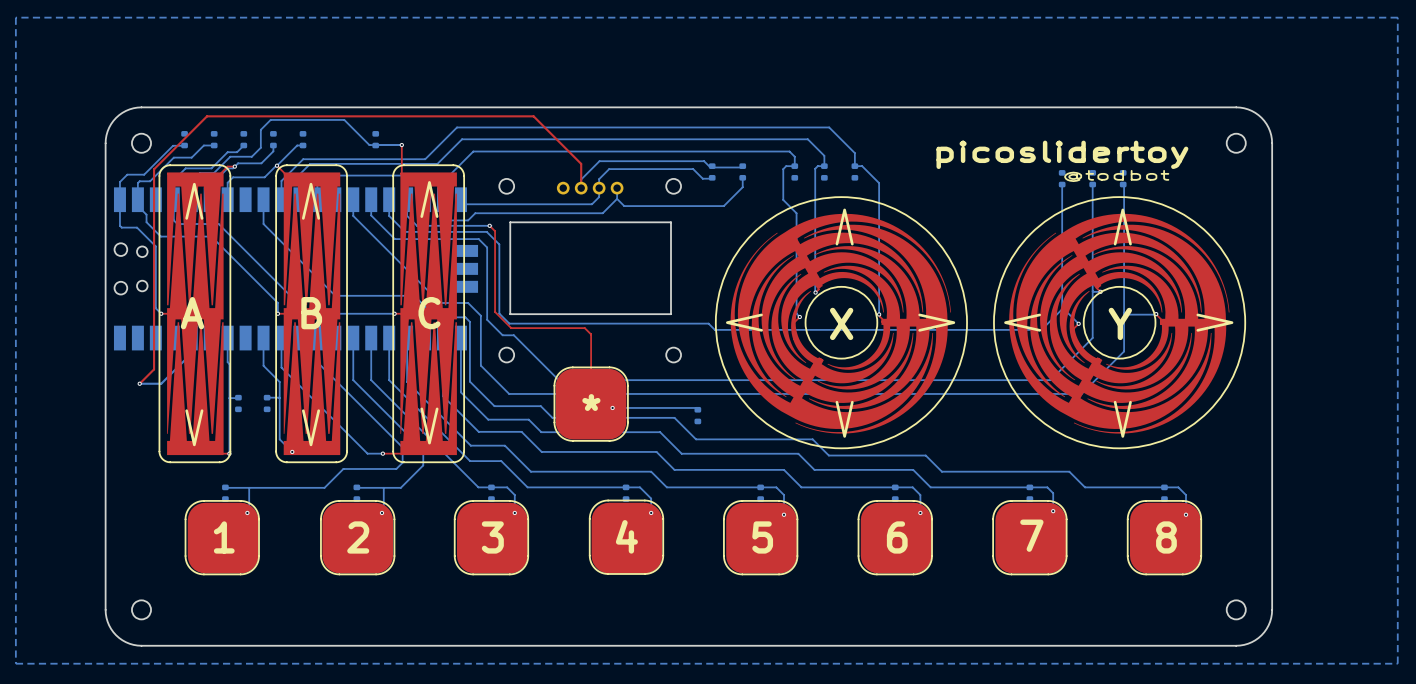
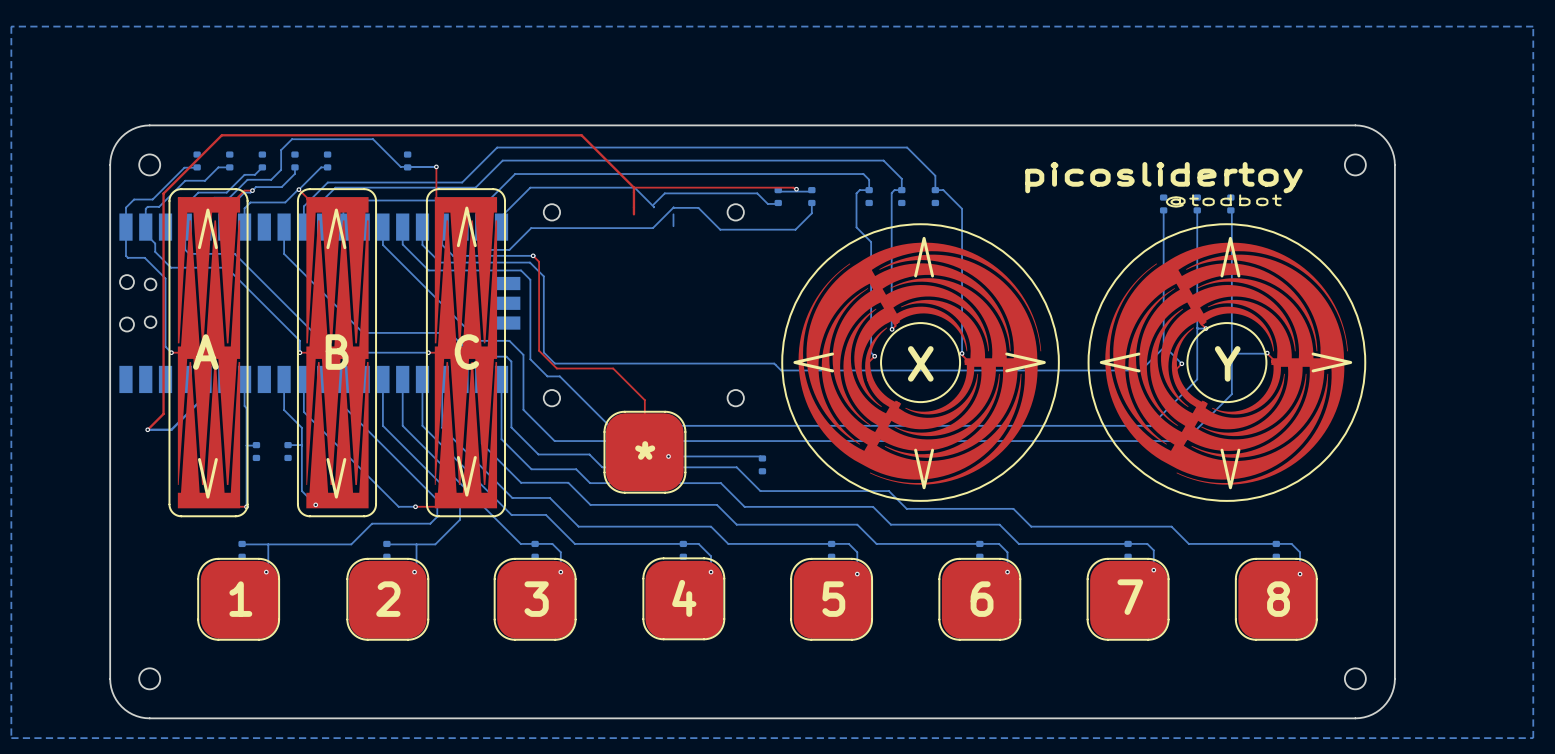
top track: none -> (633, 187) (793, 187) (796, 189)
via: none -> (796, 189)
bottom track: (709, 167) (704, 161) (599, 161) (581, 179) (581, 188) -> none
bottom track: (599, 179) (599, 197) (591, 204) (462, 204) (460, 206) -> (653, 207) (634, 187) (530, 187) (501, 216) (501, 234)
part: (590, 188) -> none
bottom track: (727, 202) (723, 206) (624, 206) (617, 198) (602, 213) (475, 213) -> (795, 229) (720, 229) (698, 207) (673, 207) (652, 228) (531, 228) (517, 242)
board edge: (510, 222) (671, 222) (671, 314) (510, 314) (510, 222) -> none
top track: (562, 328) (584, 328) (591, 334) (591, 356) -> (613, 368) (644, 400)

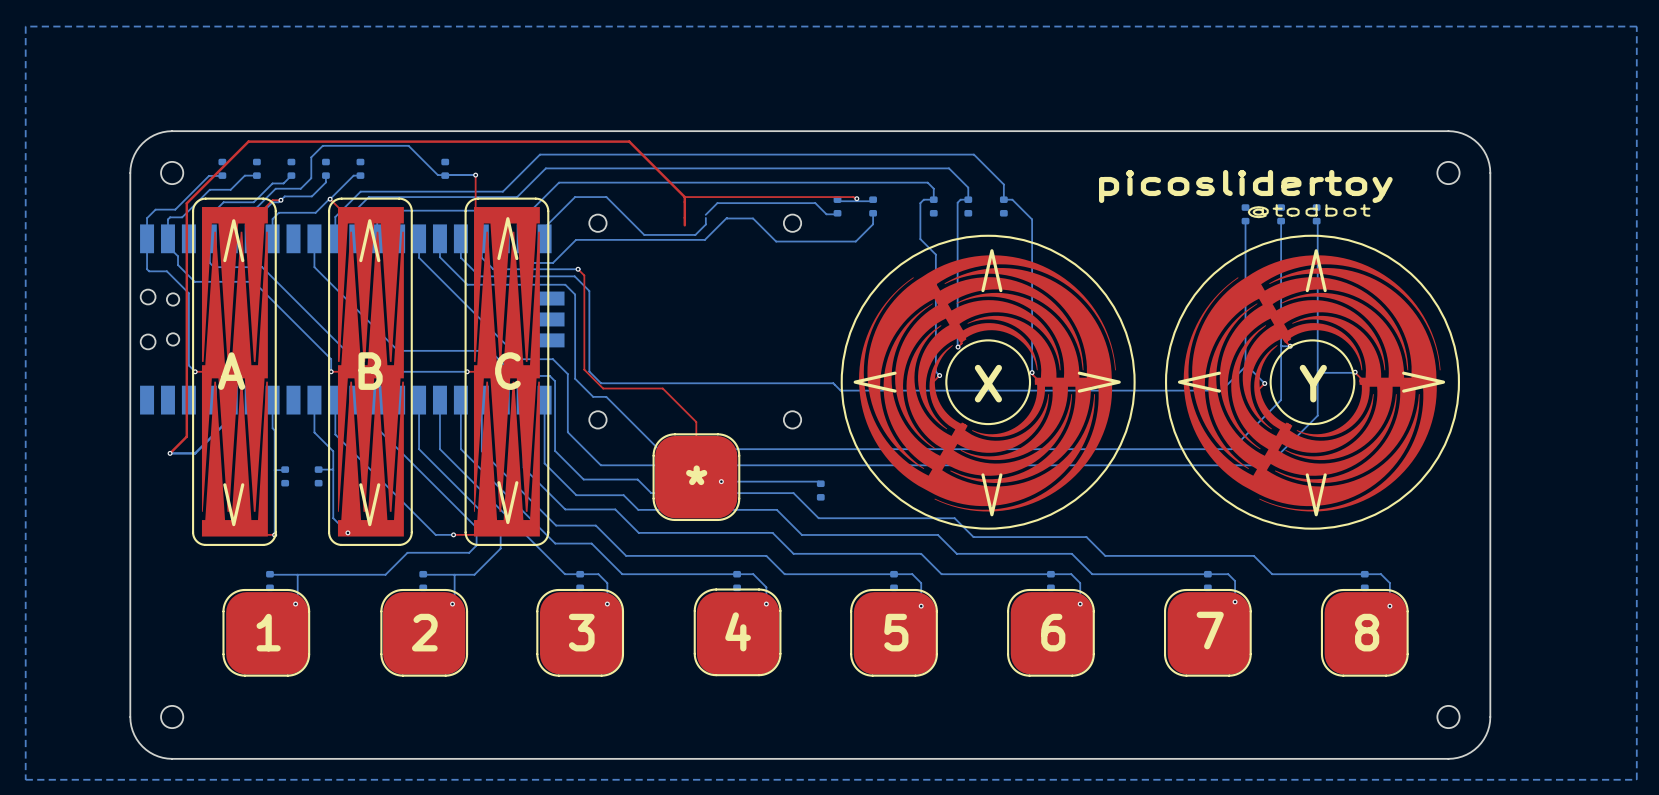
bottom track: (559, 187) (634, 187) (653, 207) -> (606, 197) (644, 234) (695, 234) (705, 224) (705, 217)
bottom track: (673, 214) (673, 226) -> none

